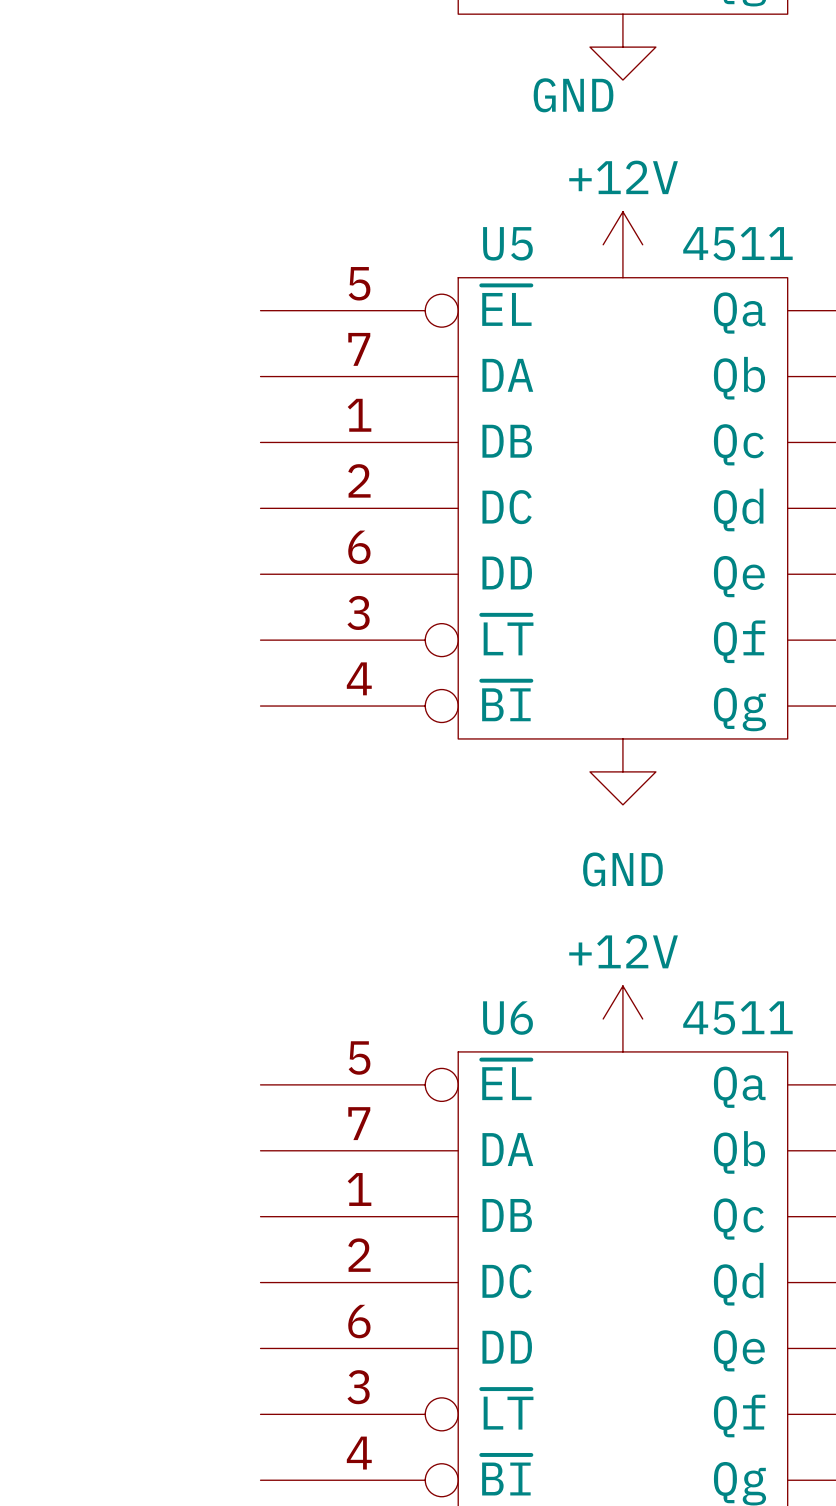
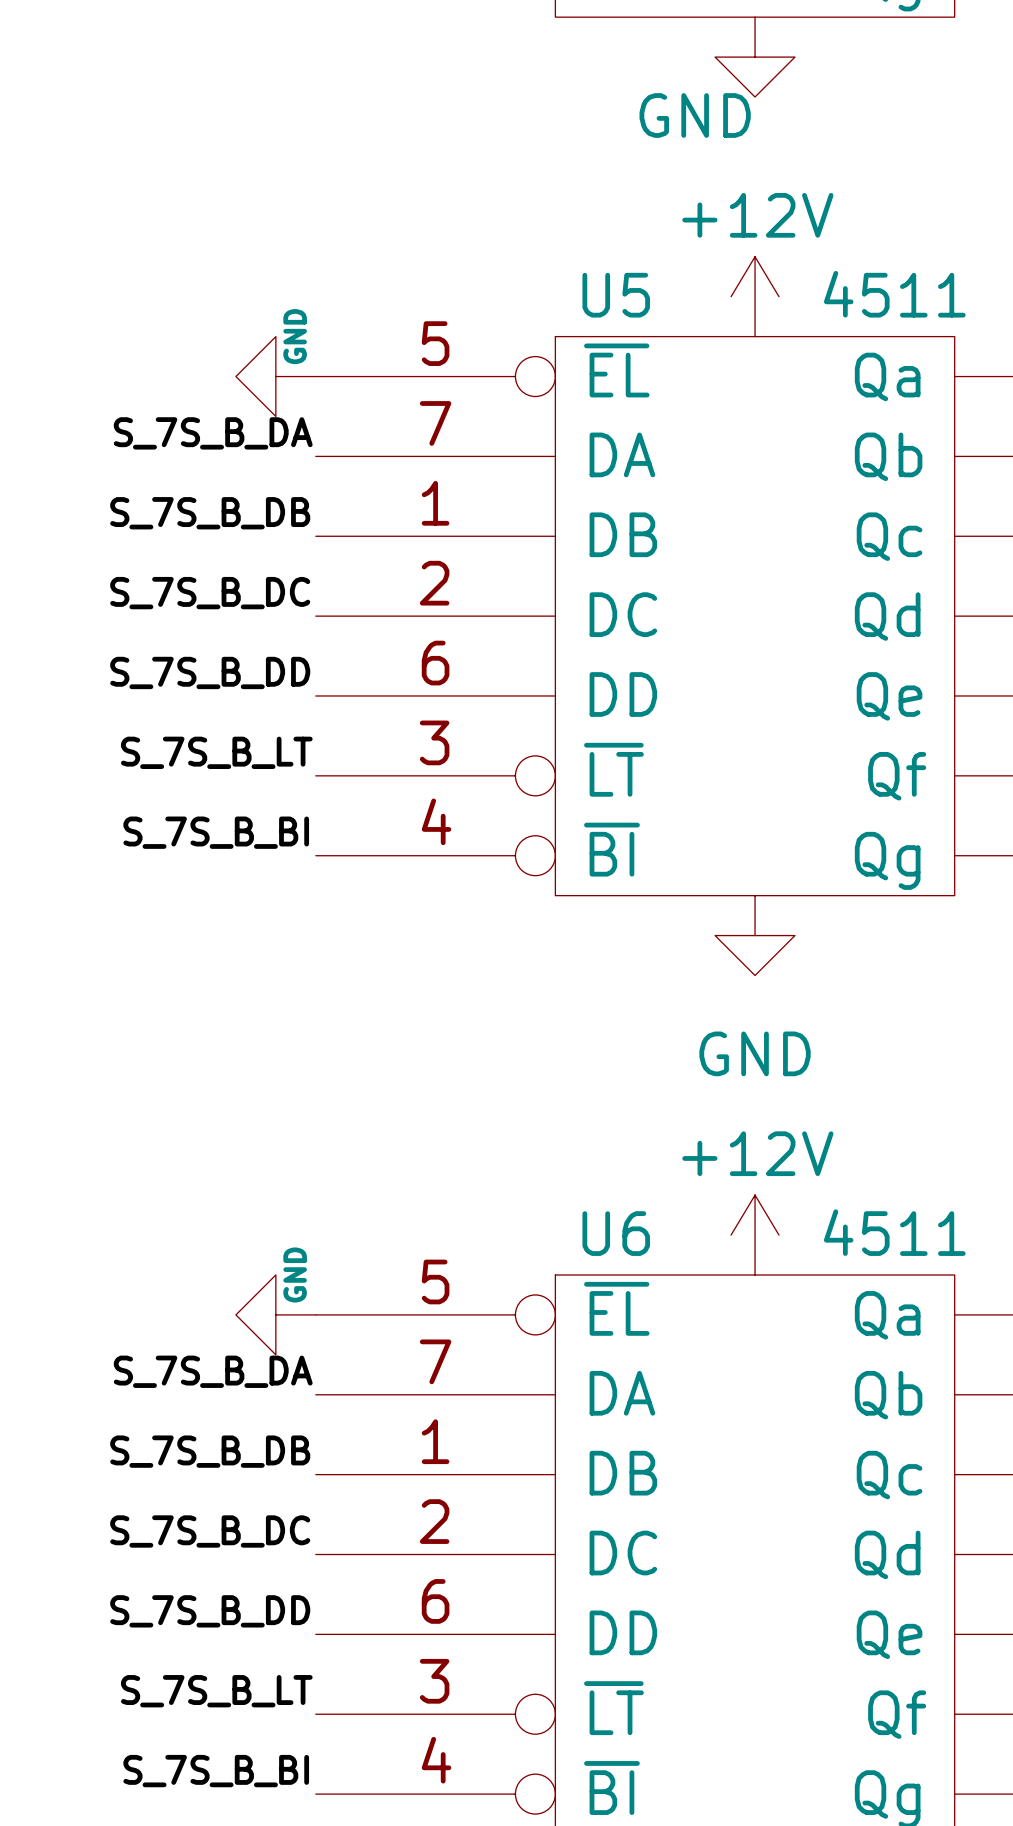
power symbol: none -> GND (275, 376)
label: none -> S_7S_B_DA (213, 433)
label: none -> S_7S_B_DB (210, 513)
label: none -> S_7S_B_DC (210, 593)
label: none -> S_7S_B_DD (210, 672)
label: none -> S_7S_B_LT (216, 752)
label: none -> S_7S_B_BI (216, 832)
power symbol: none -> GND (275, 1314)
label: none -> S_7S_B_DA (213, 1371)
label: none -> S_7S_B_DB (210, 1451)
label: none -> S_7S_B_DC (210, 1531)
label: none -> S_7S_B_DD (210, 1611)
label: none -> S_7S_B_LT (216, 1691)
label: none -> S_7S_B_BI (216, 1771)

